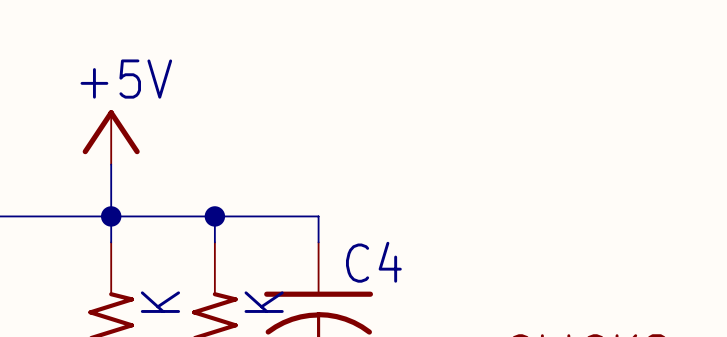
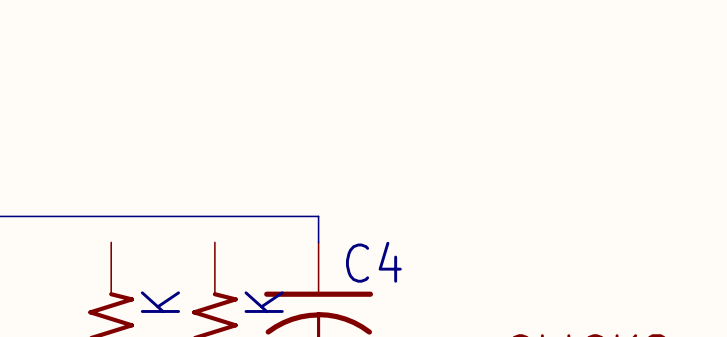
power symbol: +5V (111, 137) -> none
wire: (111, 164) (111, 242) -> none
junction: (111, 216) -> none
wire: (214, 216) (214, 242) -> none
junction: (214, 216) -> none

